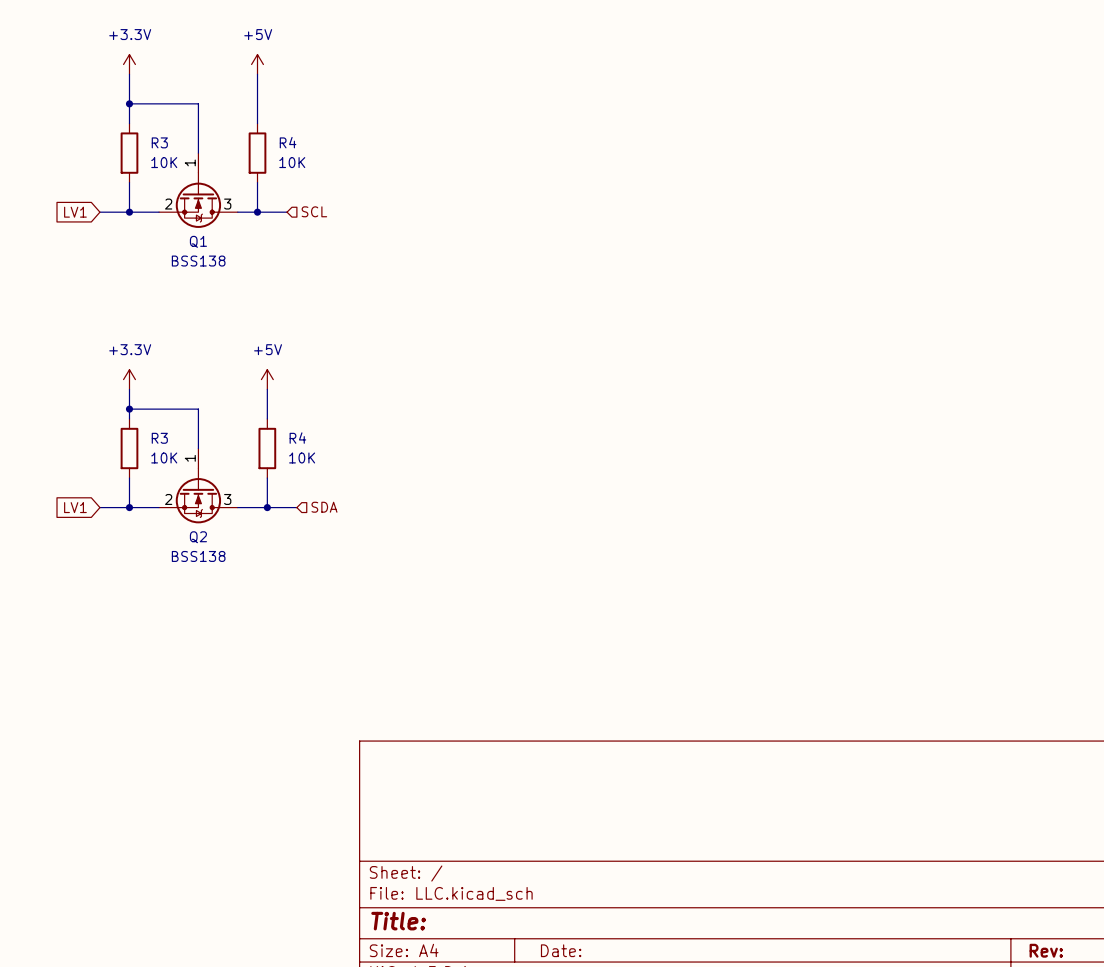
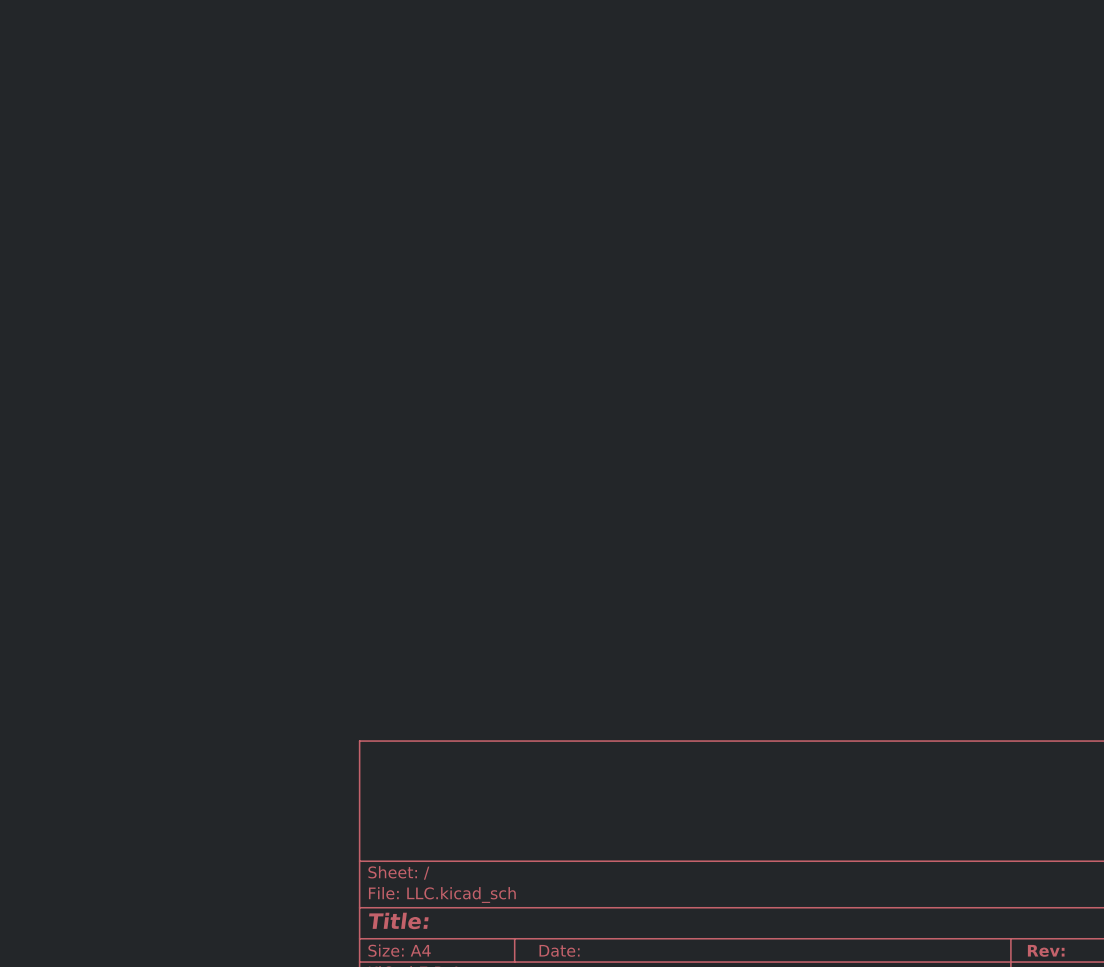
power symbol: +3.3V (129, 64) -> none
power symbol: +5V (257, 64) -> none
wire: (129, 74) (129, 123) -> none
wire: (257, 74) (257, 123) -> none
wire: (129, 103) (198, 103) (198, 153) -> none
junction: (129, 103) -> none
R3: 10K (129, 153) -> none
R4: 10K (257, 153) -> none
wire: (129, 182) (129, 212) -> none
wire: (257, 182) (257, 212) -> none
Q1: BSS138 (198, 190) -> none
hierarchical label: SCL (314, 211) -> none
global label: LV1 (75, 212) -> none
wire: (99, 212) (159, 212) -> none
junction: (129, 212) -> none
wire: (237, 212) (287, 212) -> none
junction: (257, 212) -> none
power symbol: +3.3V (129, 379) -> none
power symbol: +5V (267, 379) -> none
wire: (129, 389) (129, 418) -> none
wire: (267, 389) (267, 418) -> none
wire: (129, 409) (198, 409) (198, 448) -> none
junction: (129, 409) -> none
R3: 10K (129, 448) -> none
R4: 10K (267, 448) -> none
wire: (129, 478) (129, 507) -> none
wire: (267, 478) (267, 507) -> none
Q2: BSS138 (198, 485) -> none
global label: LV1 (75, 507) -> none
wire: (99, 507) (159, 507) -> none
junction: (129, 507) -> none
wire: (237, 507) (296, 507) -> none
junction: (267, 507) -> none
hierarchical label: SDA (324, 507) -> none

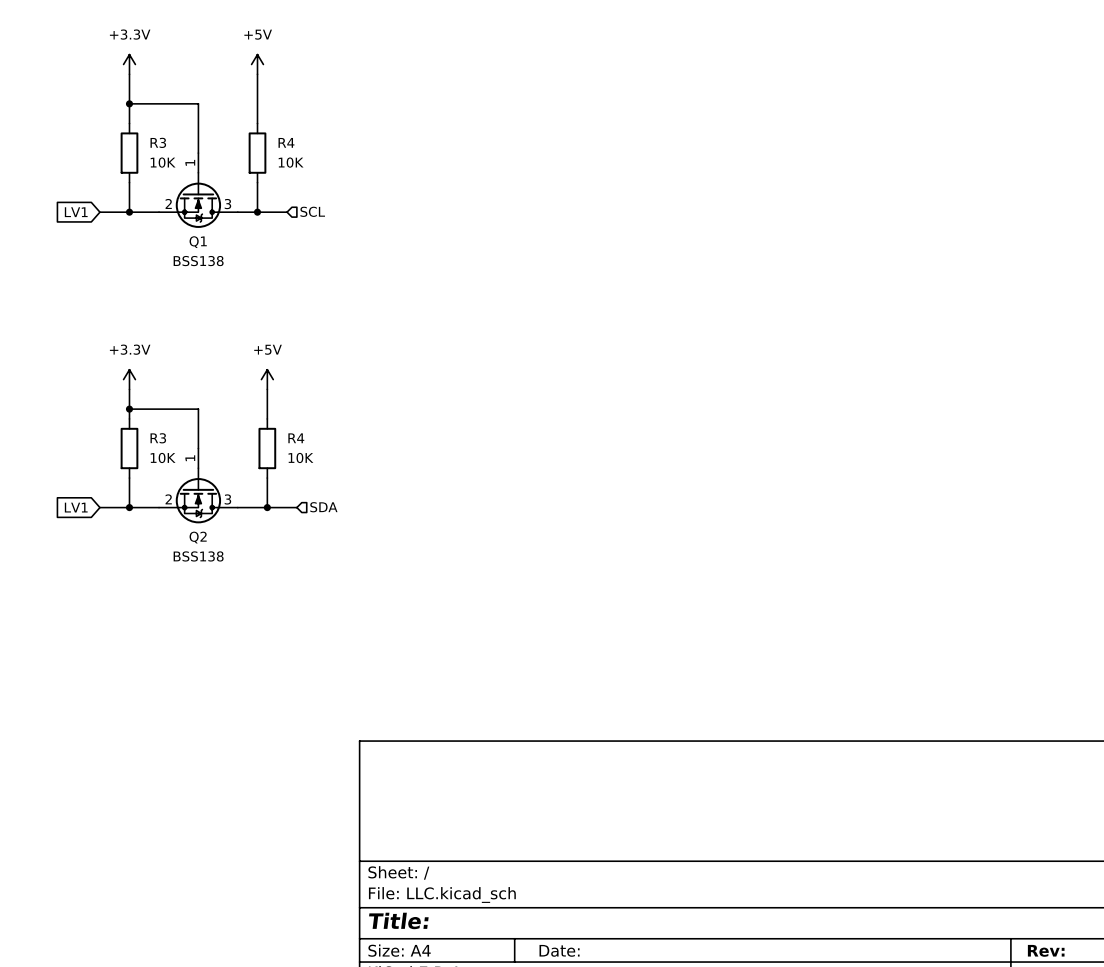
power symbol: none -> +3.3V (129, 64)
power symbol: none -> +5V (257, 64)
wire: none -> (129, 74) (129, 123)
wire: none -> (257, 74) (257, 123)
wire: none -> (129, 103) (198, 103) (198, 153)
junction: none -> (129, 103)
R3: none -> 10K (129, 153)
R4: none -> 10K (257, 153)
wire: none -> (129, 182) (129, 212)
wire: none -> (257, 182) (257, 212)
Q1: none -> BSS138 (198, 190)
hierarchical label: none -> SCL (312, 211)
global label: none -> LV1 (76, 212)
wire: none -> (99, 212) (159, 212)
junction: none -> (129, 212)
wire: none -> (237, 212) (287, 212)
junction: none -> (257, 212)
power symbol: none -> +3.3V (129, 379)
power symbol: none -> +5V (267, 379)
wire: none -> (129, 389) (129, 418)
wire: none -> (267, 389) (267, 418)
wire: none -> (129, 409) (198, 409) (198, 448)
junction: none -> (129, 409)
R3: none -> 10K (129, 448)
R4: none -> 10K (267, 448)
wire: none -> (129, 478) (129, 507)
wire: none -> (267, 478) (267, 507)
Q2: none -> BSS138 (198, 485)
global label: none -> LV1 (76, 507)
wire: none -> (99, 507) (159, 507)
junction: none -> (129, 507)
wire: none -> (237, 507) (296, 507)
junction: none -> (267, 507)
hierarchical label: none -> SDA (323, 507)

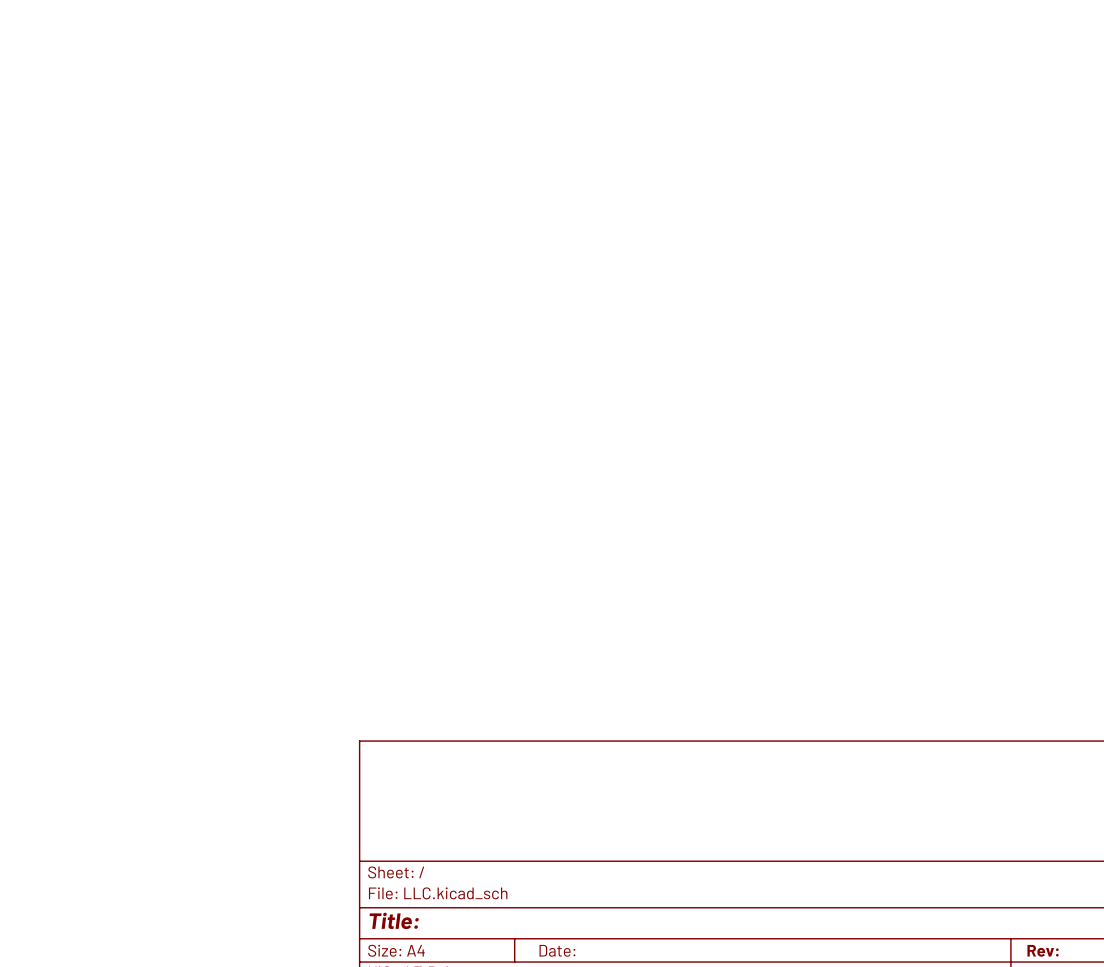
power symbol: +3.3V (129, 64) -> none
power symbol: +5V (257, 64) -> none
wire: (129, 74) (129, 123) -> none
wire: (257, 74) (257, 123) -> none
wire: (129, 103) (198, 103) (198, 153) -> none
junction: (129, 103) -> none
R3: 10K (129, 153) -> none
R4: 10K (257, 153) -> none
wire: (129, 182) (129, 212) -> none
wire: (257, 182) (257, 212) -> none
Q1: BSS138 (198, 190) -> none
hierarchical label: SCL (312, 211) -> none
global label: LV1 (76, 212) -> none
wire: (99, 212) (159, 212) -> none
junction: (129, 212) -> none
wire: (237, 212) (287, 212) -> none
junction: (257, 212) -> none
power symbol: +3.3V (129, 379) -> none
power symbol: +5V (267, 379) -> none
wire: (129, 389) (129, 418) -> none
wire: (267, 389) (267, 418) -> none
wire: (129, 409) (198, 409) (198, 448) -> none
junction: (129, 409) -> none
R3: 10K (129, 448) -> none
R4: 10K (267, 448) -> none
wire: (129, 478) (129, 507) -> none
wire: (267, 478) (267, 507) -> none
Q2: BSS138 (198, 485) -> none
global label: LV1 (76, 507) -> none
wire: (99, 507) (159, 507) -> none
junction: (129, 507) -> none
wire: (237, 507) (296, 507) -> none
junction: (267, 507) -> none
hierarchical label: SDA (323, 507) -> none

